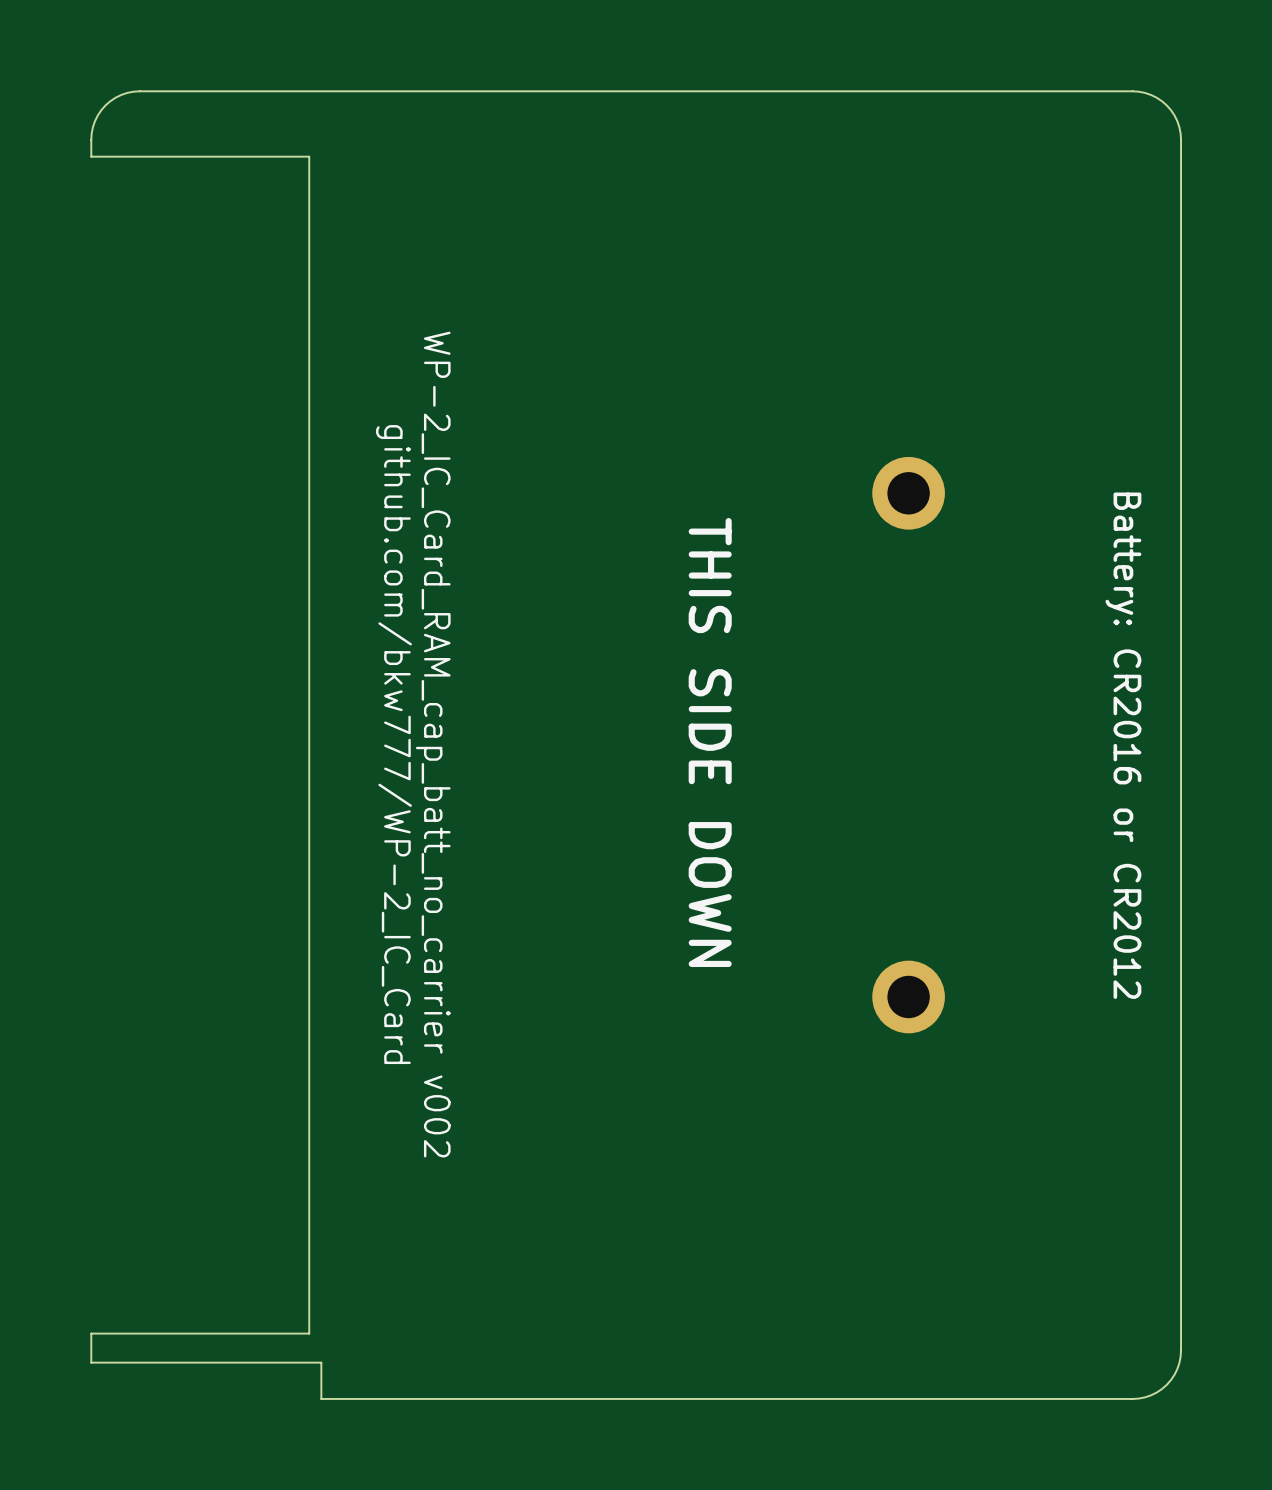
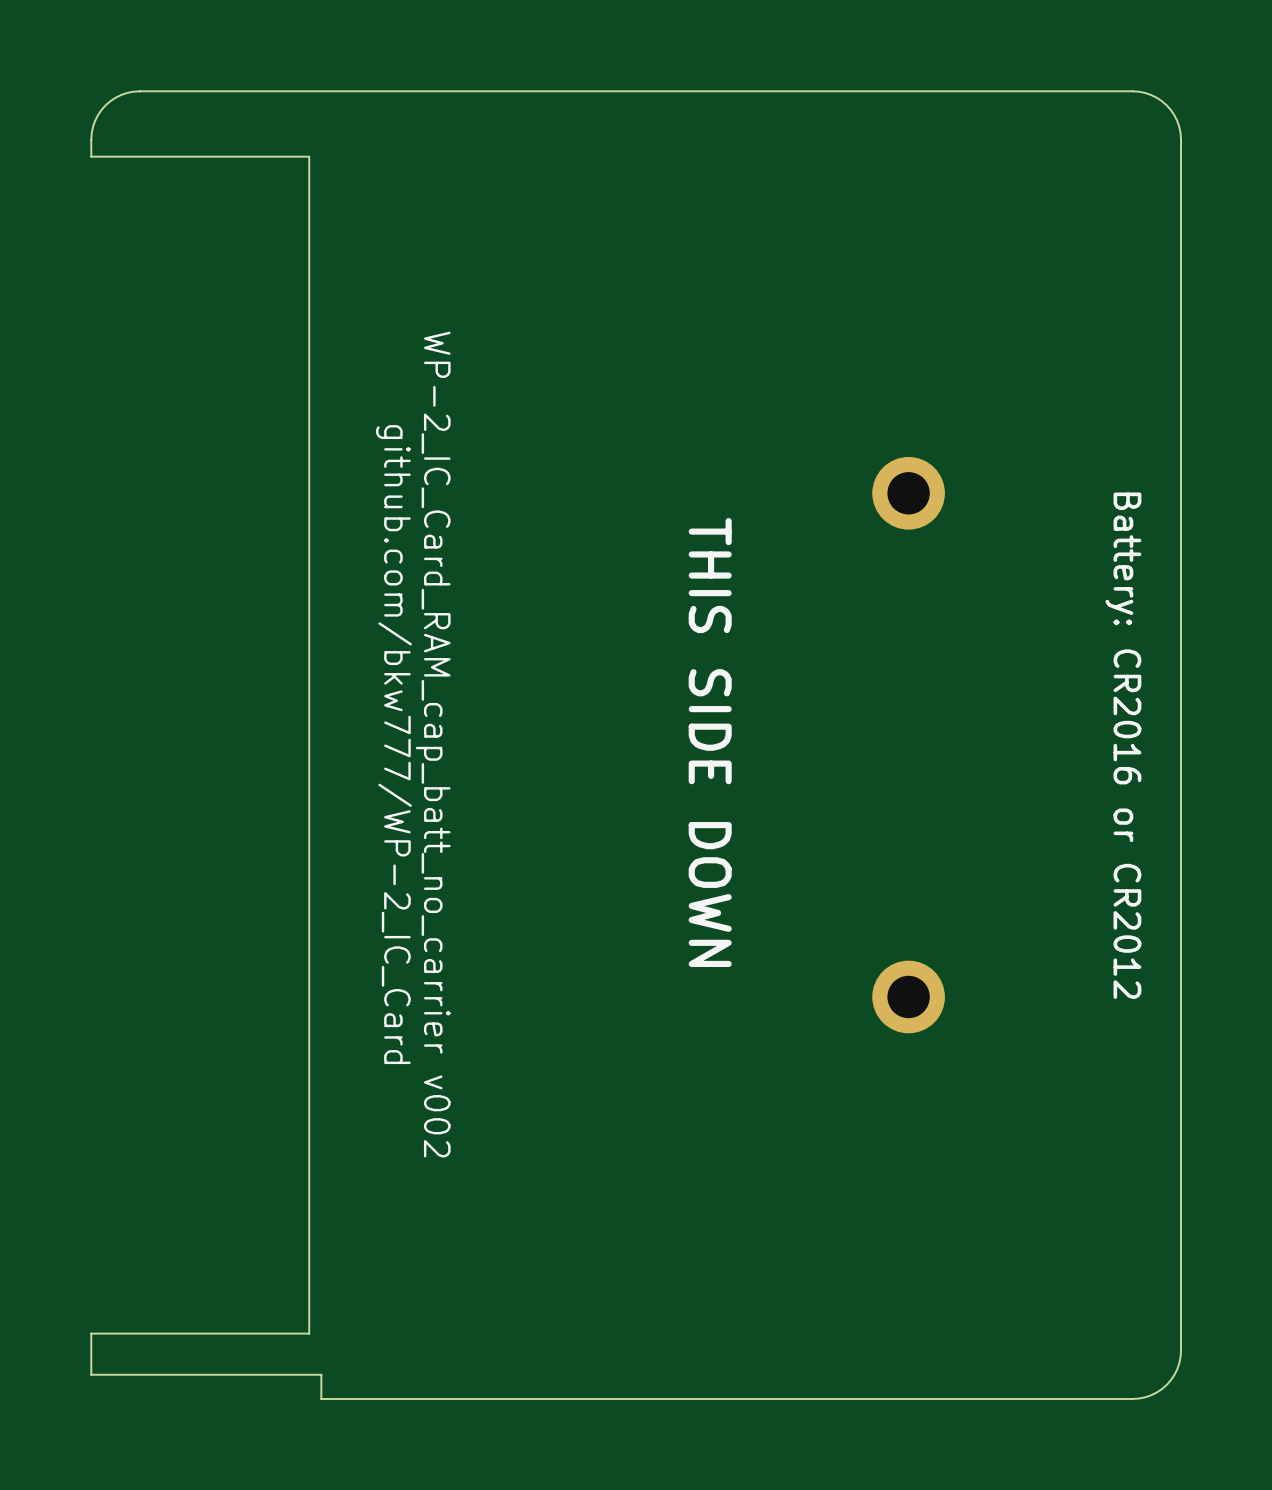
board edge: (91, 1362) (321, 1362) (321, 1374) -> (91, 1362) (91, 1374) (321, 1374)

